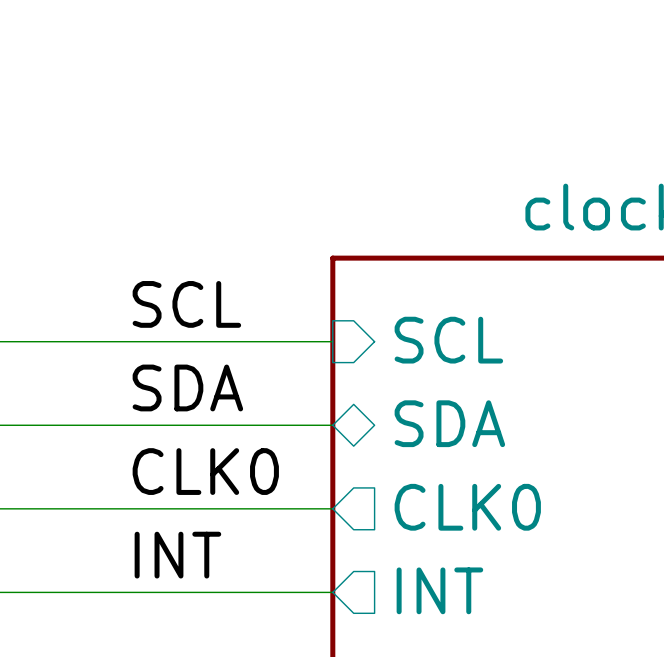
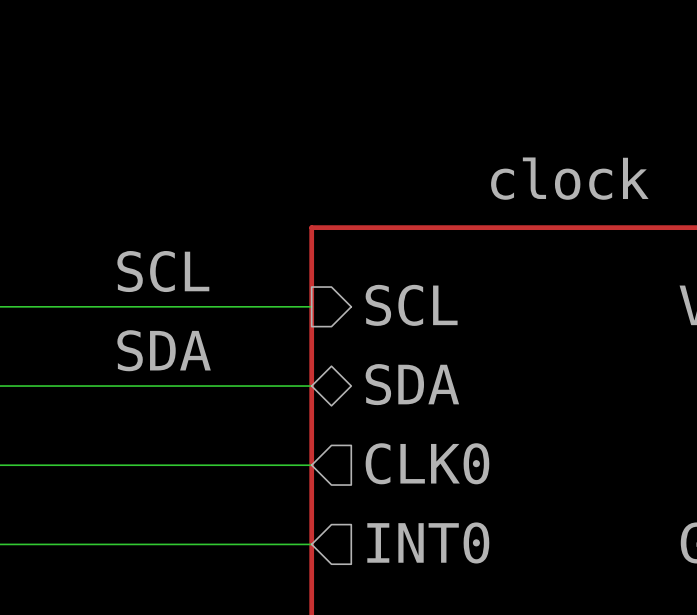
label: CLK0 (205, 471) -> none
label: INT (177, 555) -> none
sheet pin: INT (439, 590) -> INT0 (428, 542)

